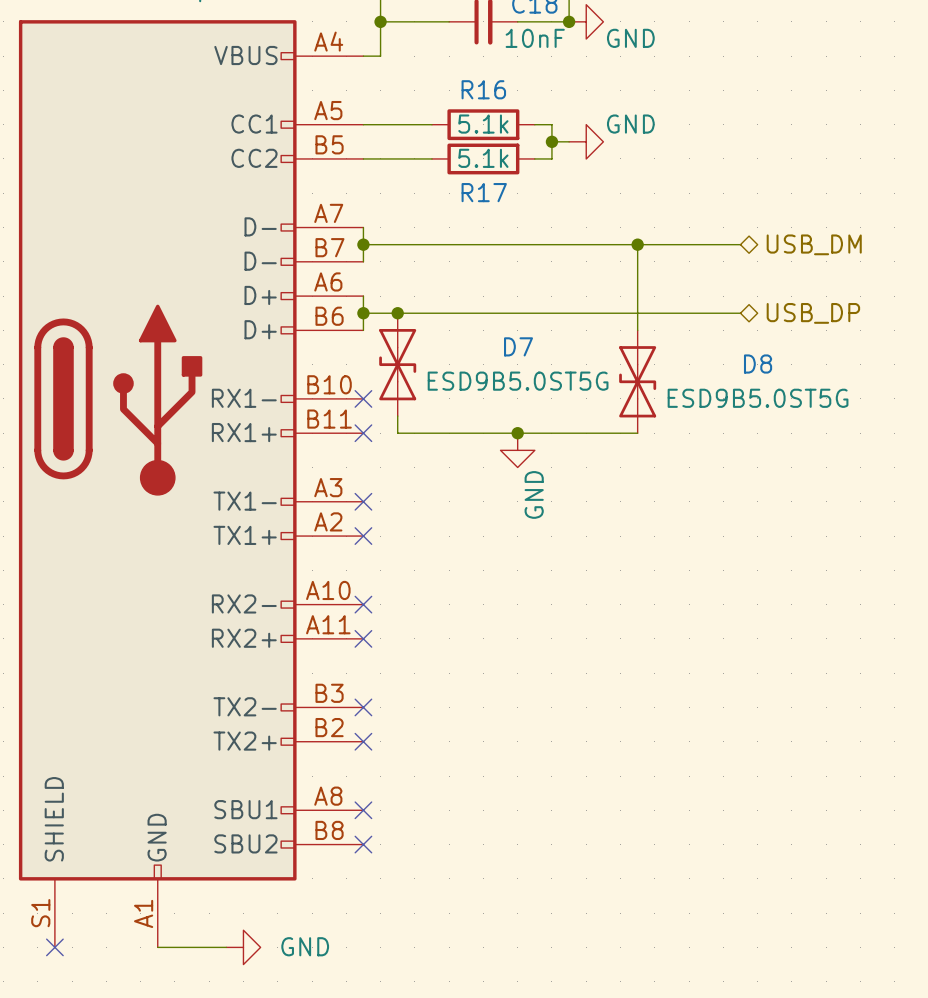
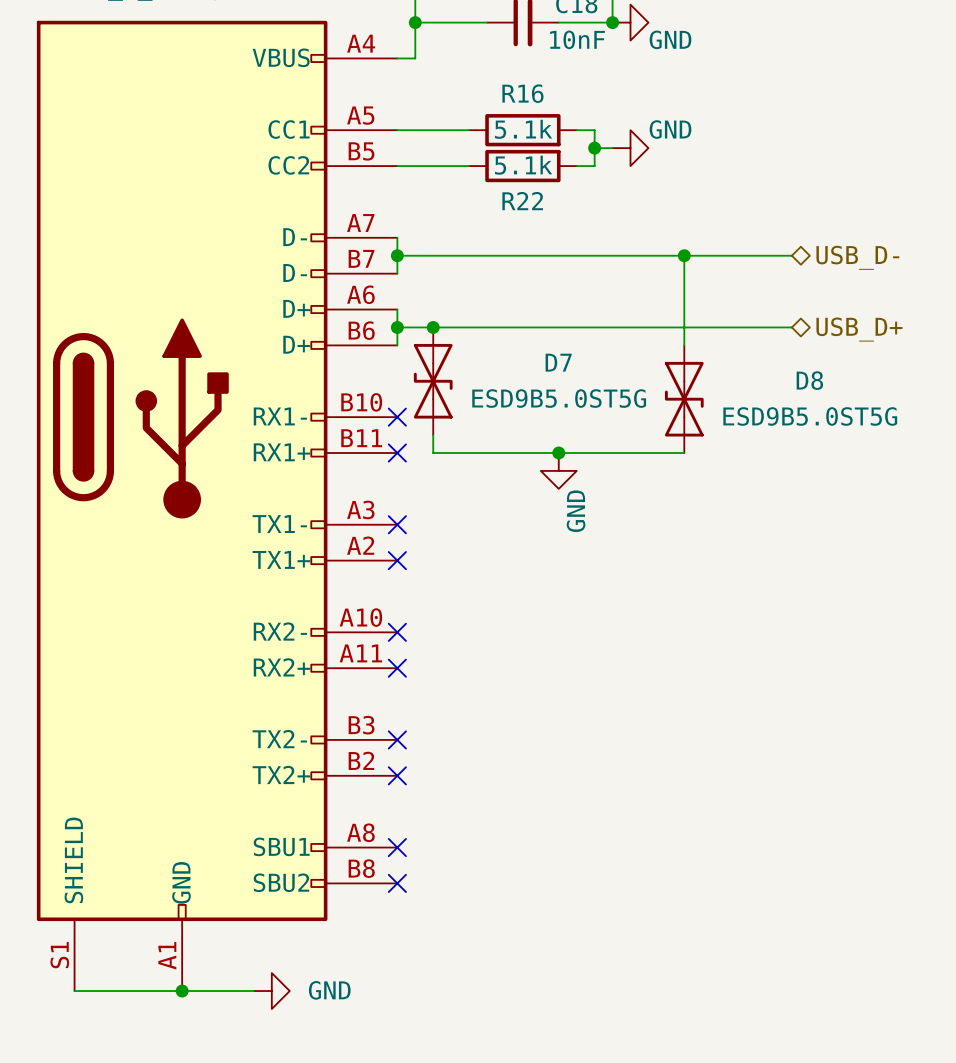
R17 name: R17 (484, 192) -> R22 (522, 201)
hierarchical label: USB_DM (814, 244) -> USB_D- (857, 257)
hierarchical label: USB_DP (813, 313) -> USB_D+ (859, 329)
wire: none -> (74, 991) (182, 991)
no-connect mark: (54, 947) -> none
junction: none -> (182, 991)

